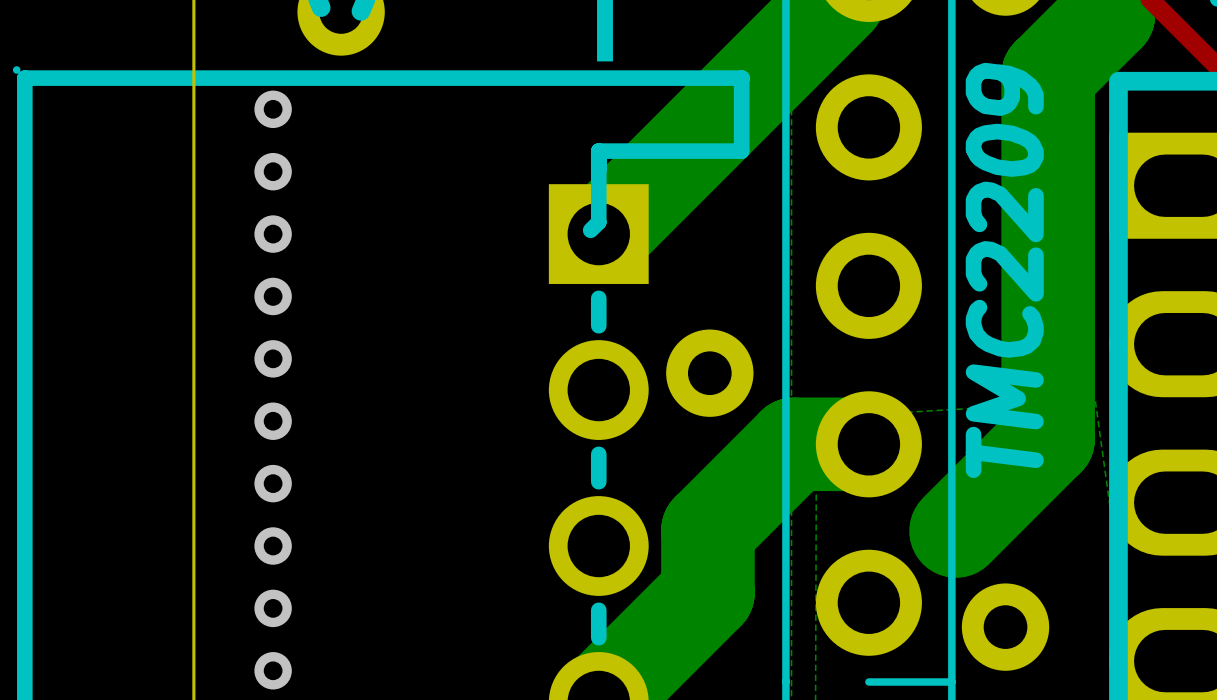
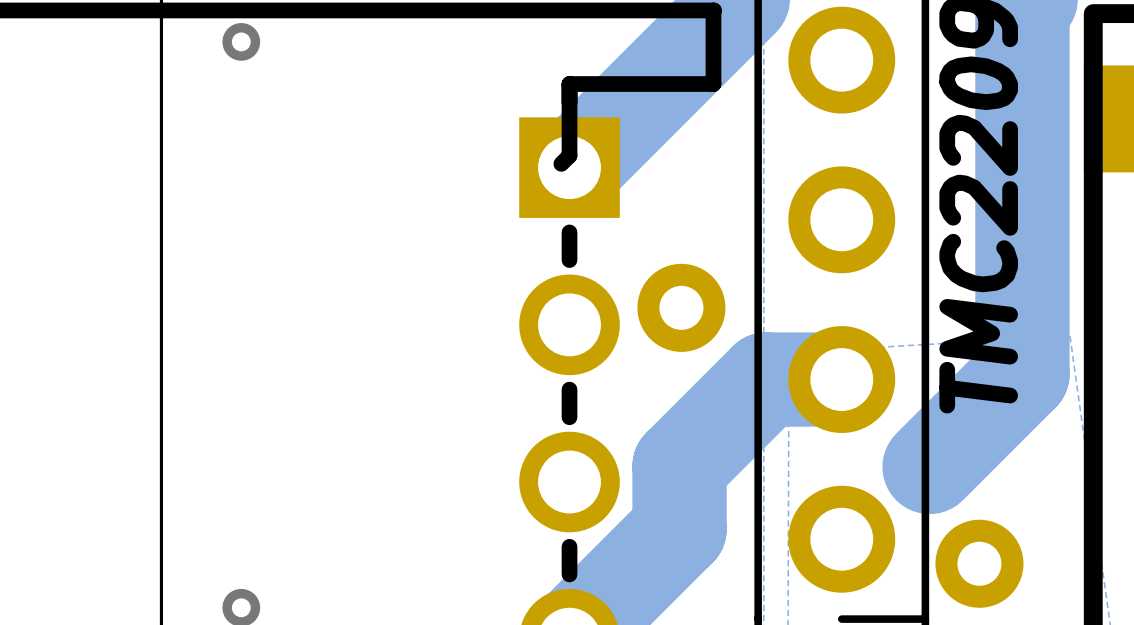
via: (273, 171) -> none
via: (273, 234) -> none
via: (273, 296) -> none
via: (273, 358) -> none
via: (273, 421) -> none
via: (273, 483) -> none
via: (273, 546) -> none
via: (273, 608) -> none

